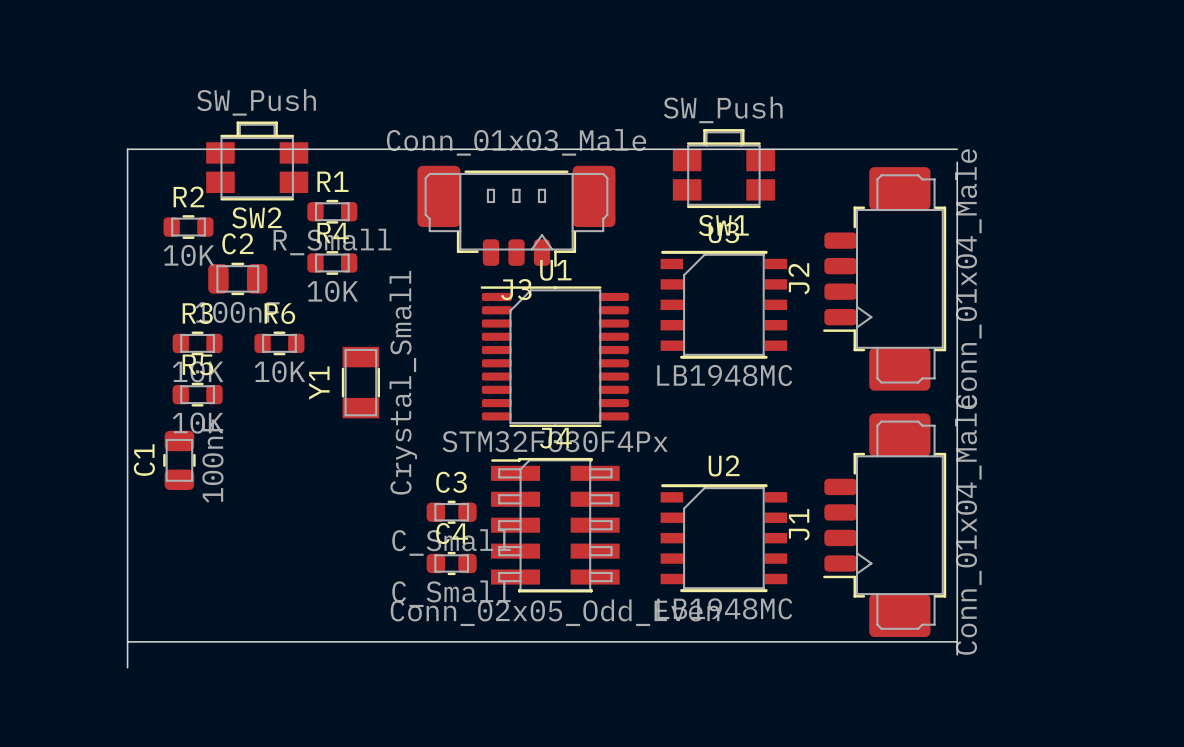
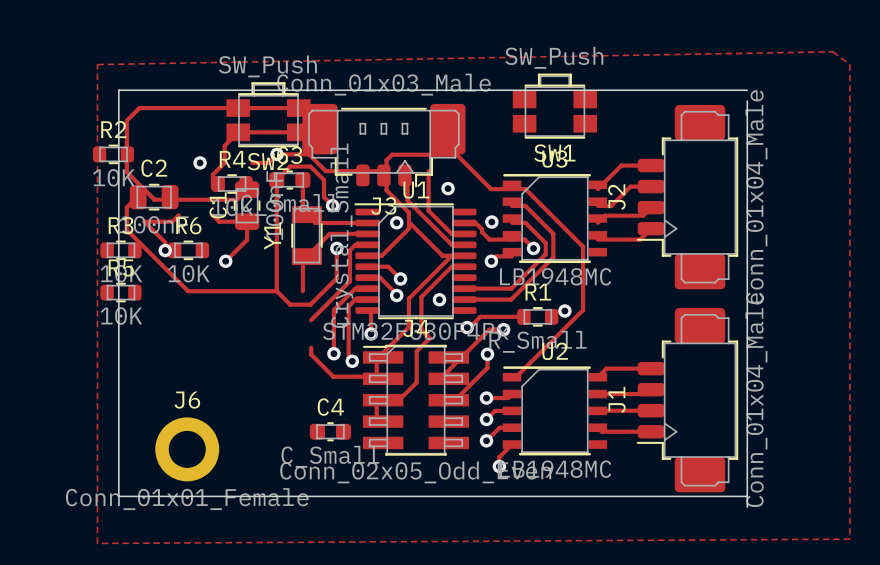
zone outline: none -> (832, 51) (97, 64) (97, 543) (849, 539) (849, 64) (832, 51)
board edge: (194, 149) (127, 149) (127, 667) -> (118, 90) (118, 496)
SW2 position: (257, 161) -> (268, 114)
track: none -> (298, 108) (139, 108) (126, 120) (126, 172) (154, 199) (237, 199) (247, 189)
track: none -> (298, 132) (238, 132) (224, 145) (224, 162) (212, 174) (212, 187)
R1 position: (332, 211) -> (537, 316)
via: none -> (277, 154)
via: none -> (200, 162)
track: none -> (252, 162) (268, 162) (277, 154) (309, 154) (325, 171) (386, 171)
track: none -> (651, 165) (621, 165) (597, 189)
track: none -> (407, 171) (407, 200) (451, 244) (464, 244)
track: none -> (428, 171) (428, 210) (451, 233) (464, 233)
track: none -> (302, 180) (302, 210) (315, 222) (367, 222)
track: none -> (651, 186) (630, 186) (611, 205) (597, 205)
via: none -> (448, 188)
track: none -> (144, 189) (126, 207) (126, 229) (188, 291) (276, 291)
track: none -> (332, 205) (324, 197) (324, 180) (310, 166) (290, 166) (276, 180) (276, 291)
via: none -> (332, 205)
track: none -> (511, 205) (525, 205) (553, 233) (553, 257) (511, 299) (464, 299)
track: none -> (651, 207) (643, 215) (604, 215) (597, 222)
track: none -> (178, 215) (172, 221) (144, 221) (165, 242) (165, 250)
track: none -> (212, 215) (219, 221) (247, 221) (247, 239) (225, 261)
track: none -> (408, 222) (442, 255) (464, 255)
via: none -> (491, 222)
via: none -> (396, 222)
track: none -> (464, 222) (475, 222) (489, 239) (524, 239) (533, 248)
track: none -> (511, 222) (525, 222) (545, 243) (545, 254) (511, 288) (464, 288)
track: none -> (651, 228) (640, 239) (597, 239)
track: none -> (367, 233) (329, 233) (302, 260) (302, 291)
track: none -> (367, 244) (355, 244) (349, 250) (349, 281) (311, 320)
track: none -> (336, 248) (336, 278) (310, 304) (290, 304) (276, 291)
via: none -> (336, 248)
via: none -> (533, 248)
via: none -> (165, 250)
track: none -> (367, 255) (381, 255) (408, 228) (408, 212) (386, 190) (386, 160) (392, 154) (456, 154) (491, 189) (525, 189) (583, 246) (583, 310) (515, 377) (511, 377)
track: none -> (451, 255) (408, 298) (408, 327) (376, 359) (376, 376) (333, 376) (311, 354) (311, 347)
track: none -> (511, 256) (496, 256) (491, 261)
via: none -> (225, 261)
via: none -> (491, 261)
track: none -> (367, 266) (388, 266) (400, 278)
track: none -> (464, 266) (451, 266) (421, 297) (421, 329) (429, 338) (416, 351) (416, 382) (401, 398) (376, 398) (376, 419)
track: none -> (367, 277) (380, 277) (396, 295)
via: none -> (400, 278)
Y1 position: (360, 382) -> (306, 235)
track: none -> (367, 288) (355, 288) (333, 310) (333, 353)
via: none -> (396, 295)
track: none -> (367, 299) (355, 299) (348, 306) (348, 357) (352, 361)
via: none -> (439, 299)
track: none -> (367, 310) (371, 313) (371, 333)
via: none -> (564, 310)
track: none -> (523, 316) (480, 316) (467, 327)
via: none -> (467, 327)
track: none -> (503, 329) (489, 329) (442, 376)
via: none -> (503, 329)
via: none -> (371, 333)
C1 position: (179, 460) -> (247, 205)
via: none -> (333, 353)
track: none -> (487, 354) (487, 367) (457, 398) (442, 398)
via: none -> (487, 354)
via: none -> (352, 361)
track: none -> (651, 368) (606, 368) (597, 377)
C3 position: (451, 512) -> (289, 180)
track: none -> (651, 389) (646, 394) (597, 394)
track: none -> (511, 394) (507, 398) (486, 398)
via: none -> (486, 398)
track: none -> (598, 410) (651, 410)
track: none -> (511, 410) (495, 410) (486, 419)
via: none -> (486, 419)
track: none -> (511, 427) (499, 427) (486, 440)
track: none -> (597, 427) (601, 431) (651, 431)
via: none -> (486, 440)
track: none -> (511, 444) (499, 457) (499, 466)
J6: none -> Conn_01x01_Female (187, 449)
via: none -> (499, 466)
board edge: (127, 641) (194, 641) -> none

